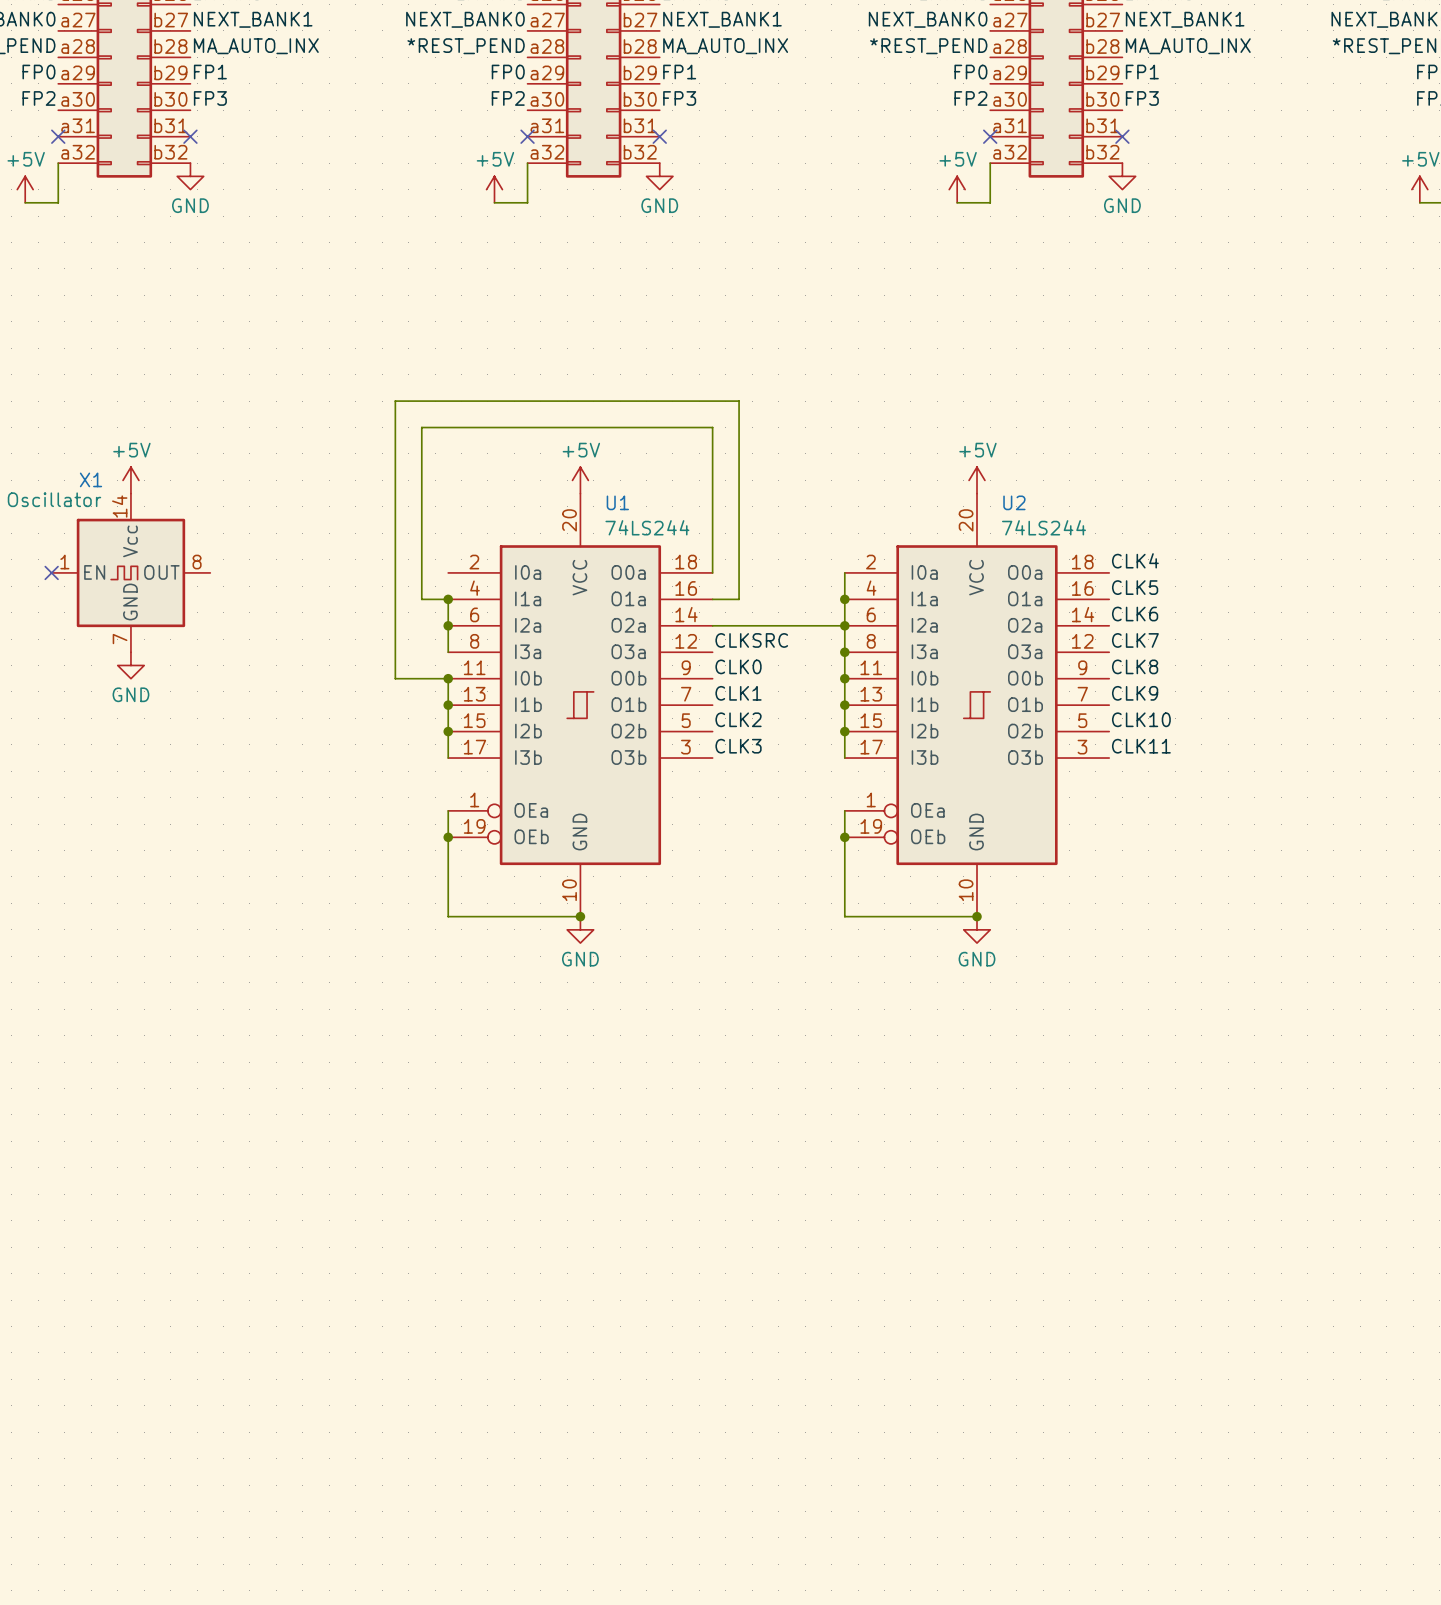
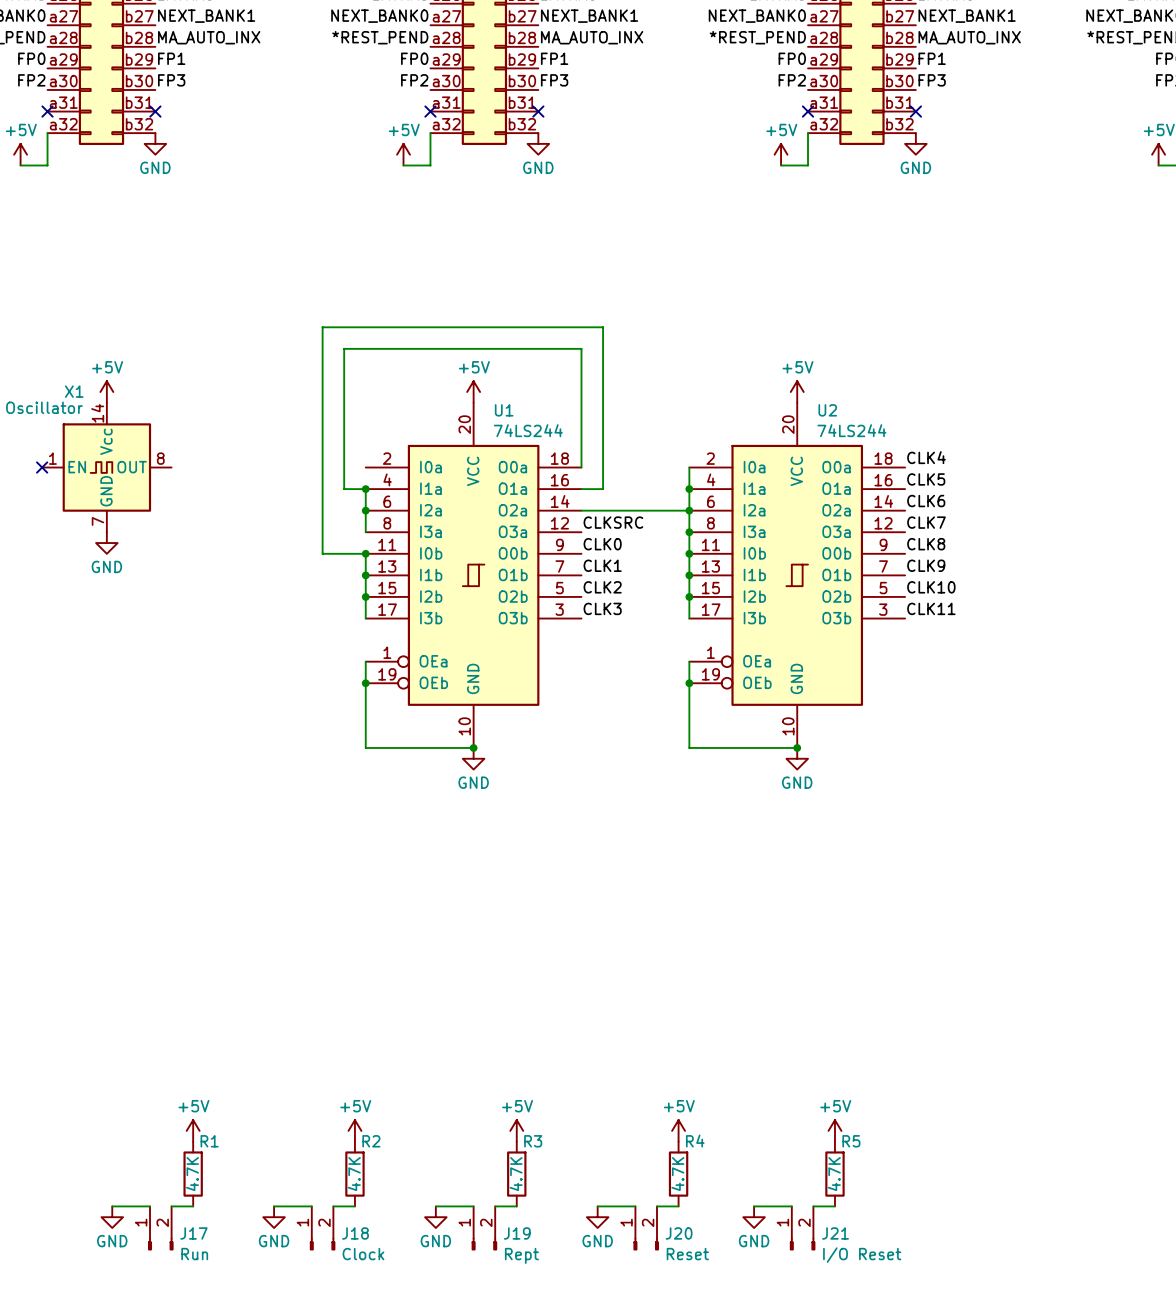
power symbol: none -> +5V (193, 1130)
power symbol: none -> +5V (354, 1130)
power symbol: none -> +5V (516, 1130)
power symbol: none -> +5V (678, 1130)
power symbol: none -> +5V (834, 1130)
R1: none -> 4.7K (193, 1174)
R2: none -> 4.7K (354, 1174)
R3: none -> 4.7K (516, 1174)
R4: none -> 4.7K (678, 1174)
R5: none -> 4.7K (834, 1174)
wire: none -> (112, 1206) (150, 1206)
wire: none -> (171, 1206) (193, 1206)
wire: none -> (274, 1206) (311, 1206)
wire: none -> (333, 1206) (354, 1206)
wire: none -> (435, 1206) (473, 1206)
wire: none -> (495, 1206) (516, 1206)
wire: none -> (597, 1206) (635, 1206)
wire: none -> (656, 1206) (678, 1206)
wire: none -> (754, 1206) (791, 1206)
wire: none -> (813, 1206) (834, 1206)
power symbol: none -> GND (112, 1217)
power symbol: none -> GND (274, 1217)
power symbol: none -> GND (435, 1217)
power symbol: none -> GND (597, 1217)
power symbol: none -> GND (754, 1217)
J17: none -> Run (160, 1228)
J18: none -> Clock (322, 1228)
J19: none -> Rept (484, 1228)
J20: none -> Reset (646, 1228)
J21: none -> I/O Reset (802, 1228)

